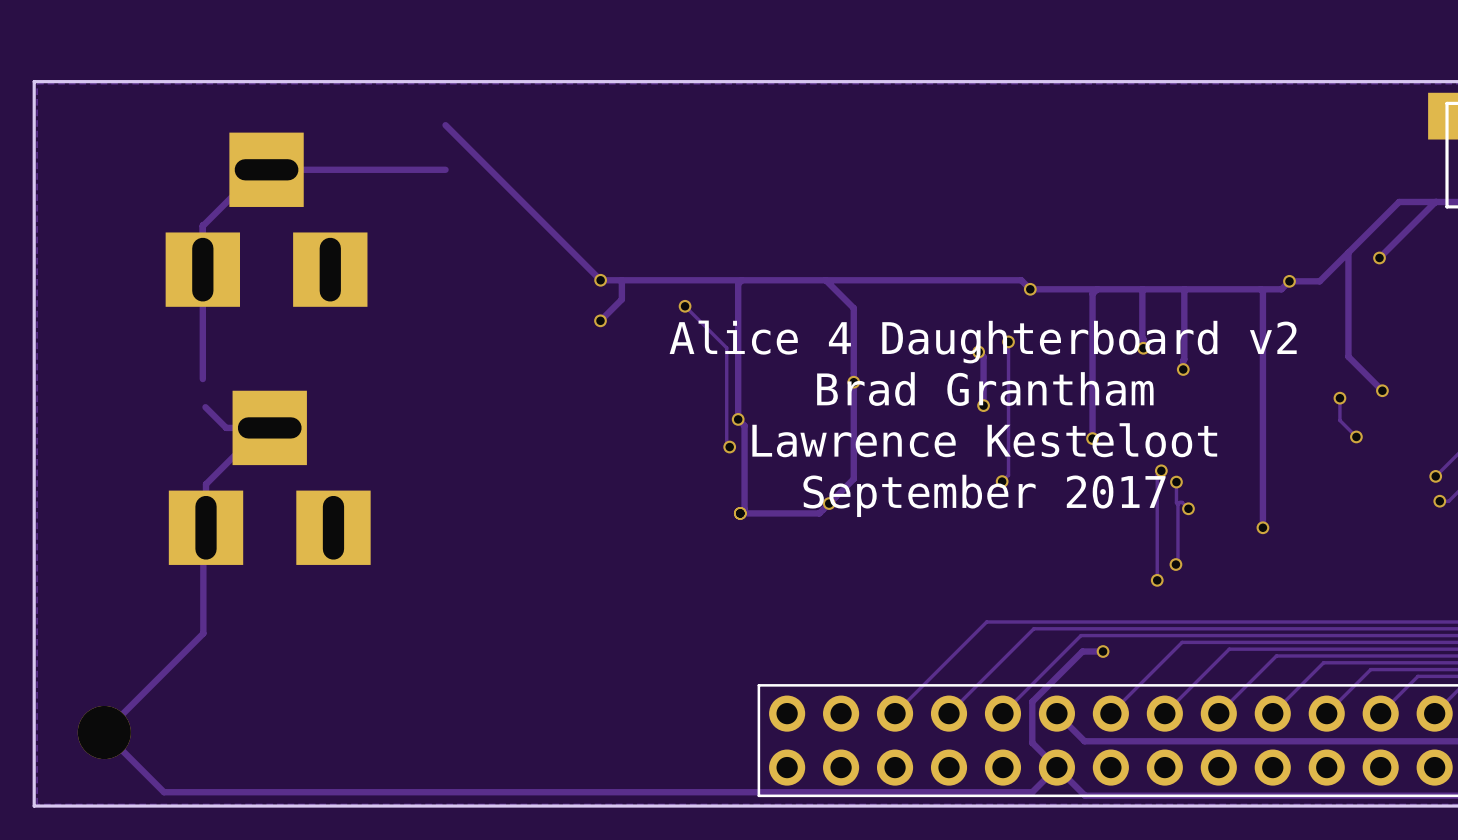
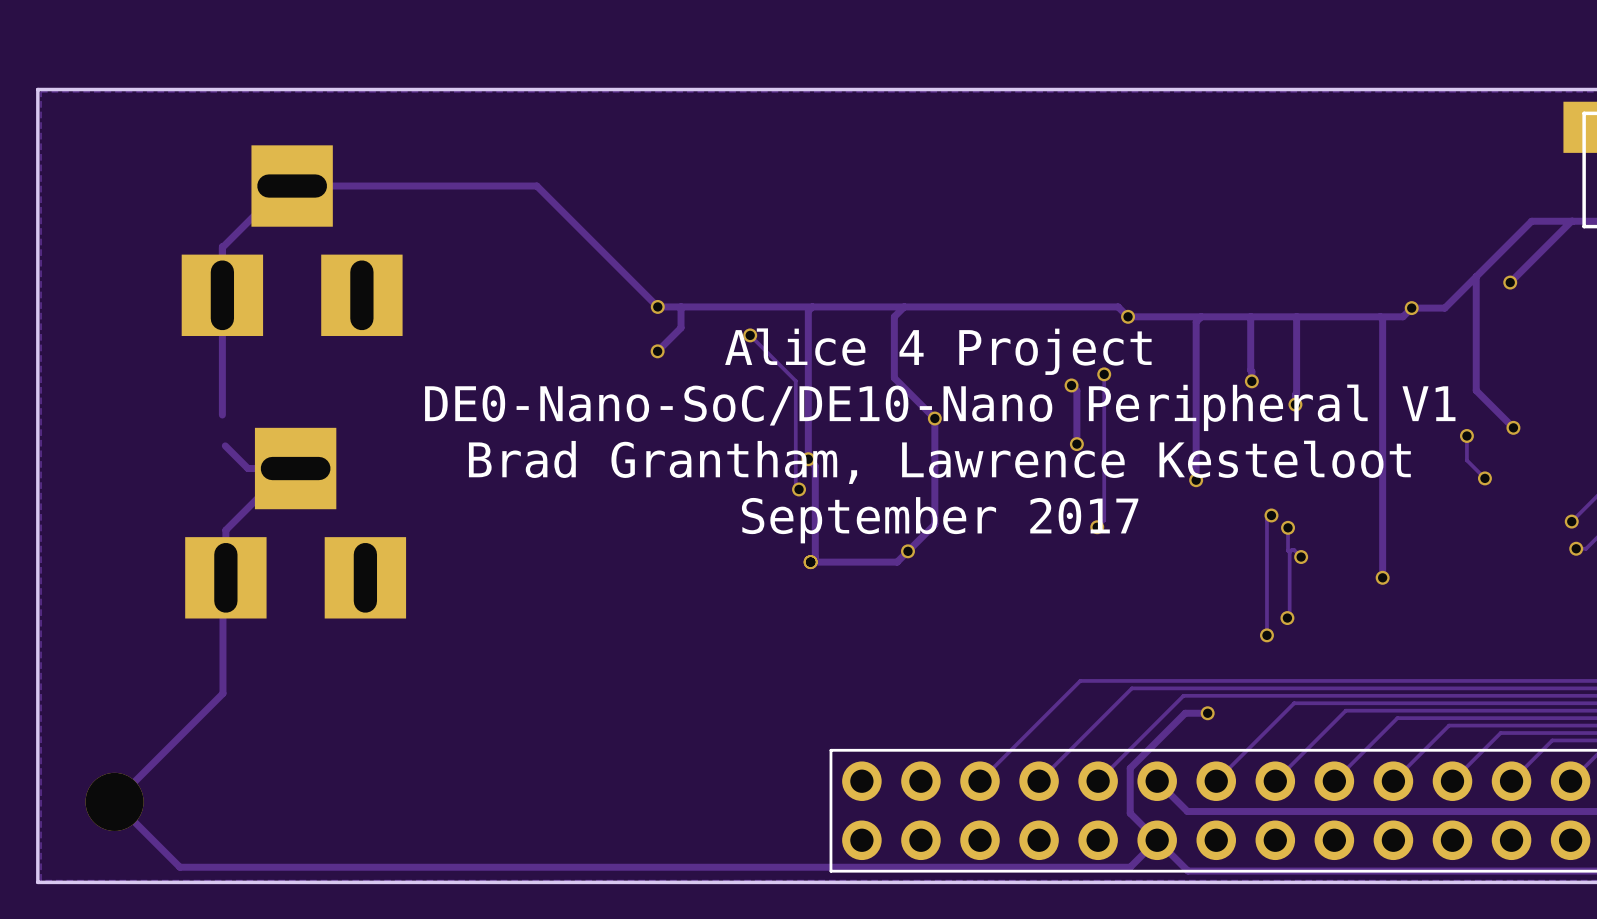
track: (445, 125) (490, 169) -> (488, 186) (536, 186)
track: (825, 280) (853, 308) (853, 382) -> (904, 306) (894, 316) (894, 378) (934, 418)
text: none -> Alice 4 Project (938, 351)
text: Alice 4 Daughterboard v2 (983, 341) -> none
text: none -> DE0-Nano-SoC/DE10-Nano Peripheral V1 (940, 407)
text: Brad Grantham (985, 389) -> none
text: Lawrence Kesteloot (984, 440) -> Brad Grantham, Lawrence Kesteloot (939, 462)
text position: September 2017 (984, 495) -> September 2017 (940, 520)

